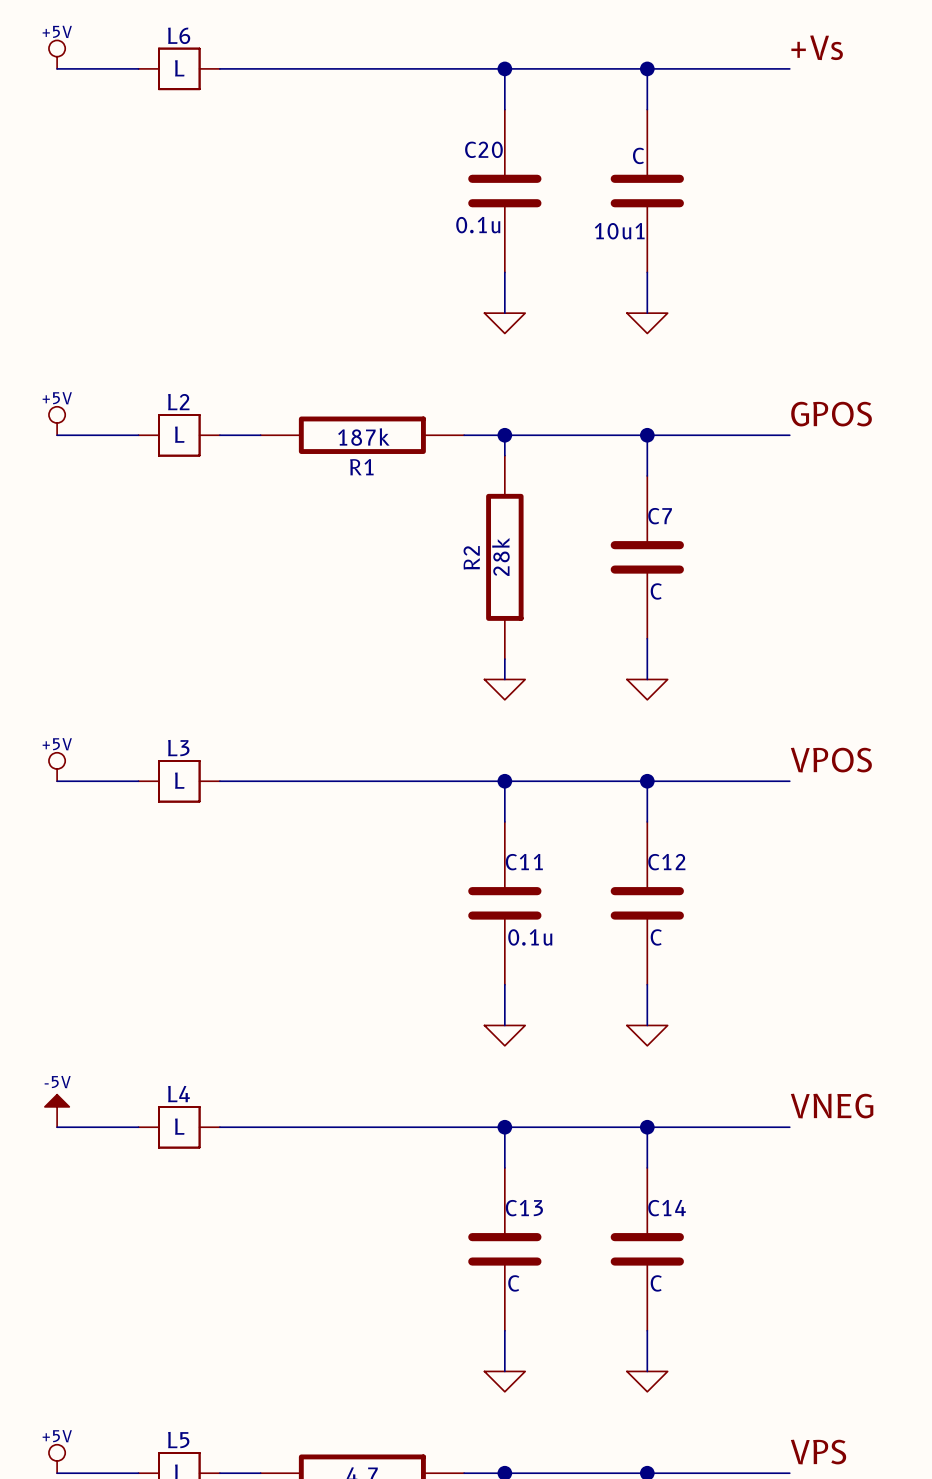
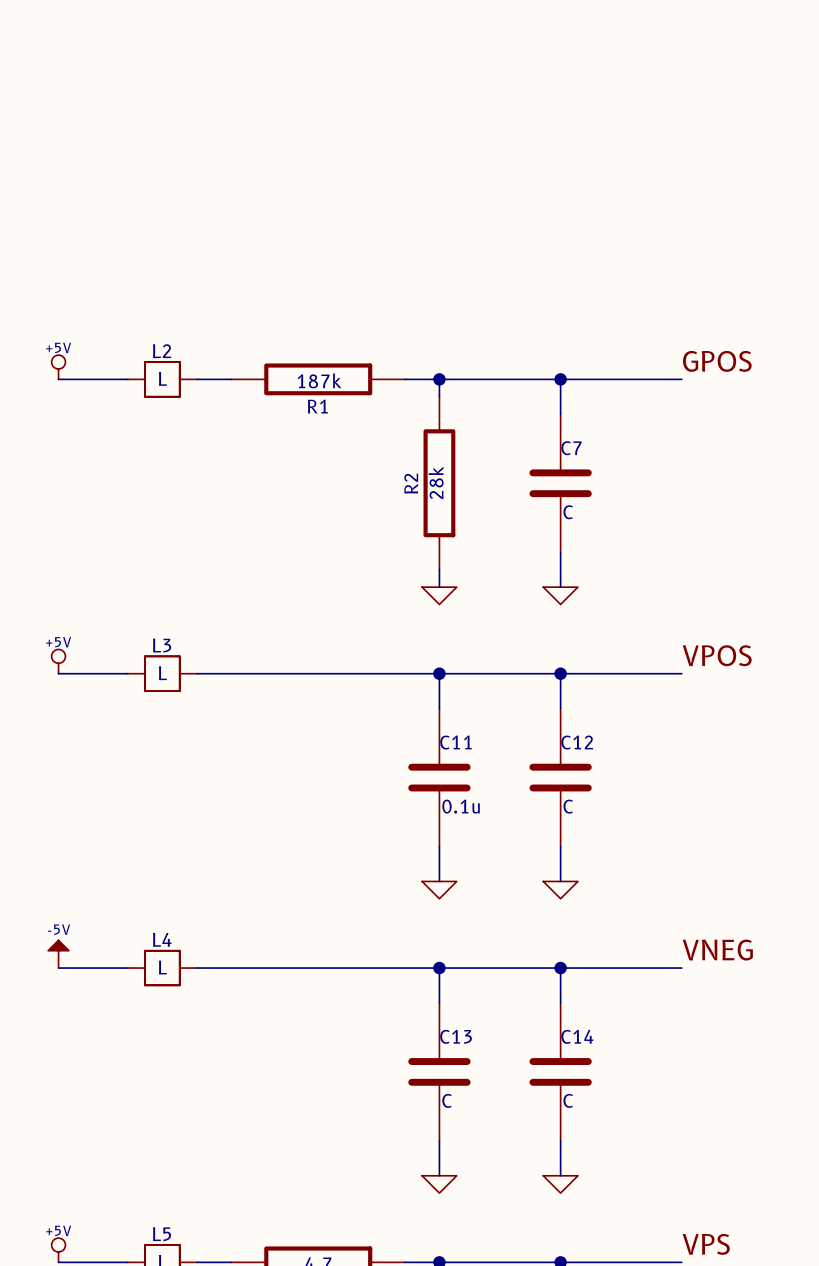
label: +Vs (817, 47) -> none
power symbol: +5V (57, 54) -> none
wire: (57, 68) (138, 68) -> none
L6: L (179, 68) -> none
wire: (219, 68) (789, 68) -> none
wire: (504, 68) (504, 109) -> none
junction: (504, 68) -> none
wire: (647, 68) (647, 109) -> none
junction: (647, 68) -> none
C20: 0.1u (504, 191) -> none
10u1: C (647, 191) -> none
wire: (504, 272) (504, 313) -> none
wire: (647, 272) (647, 313) -> none
power symbol: (504, 323) -> none
power symbol: (647, 323) -> none

